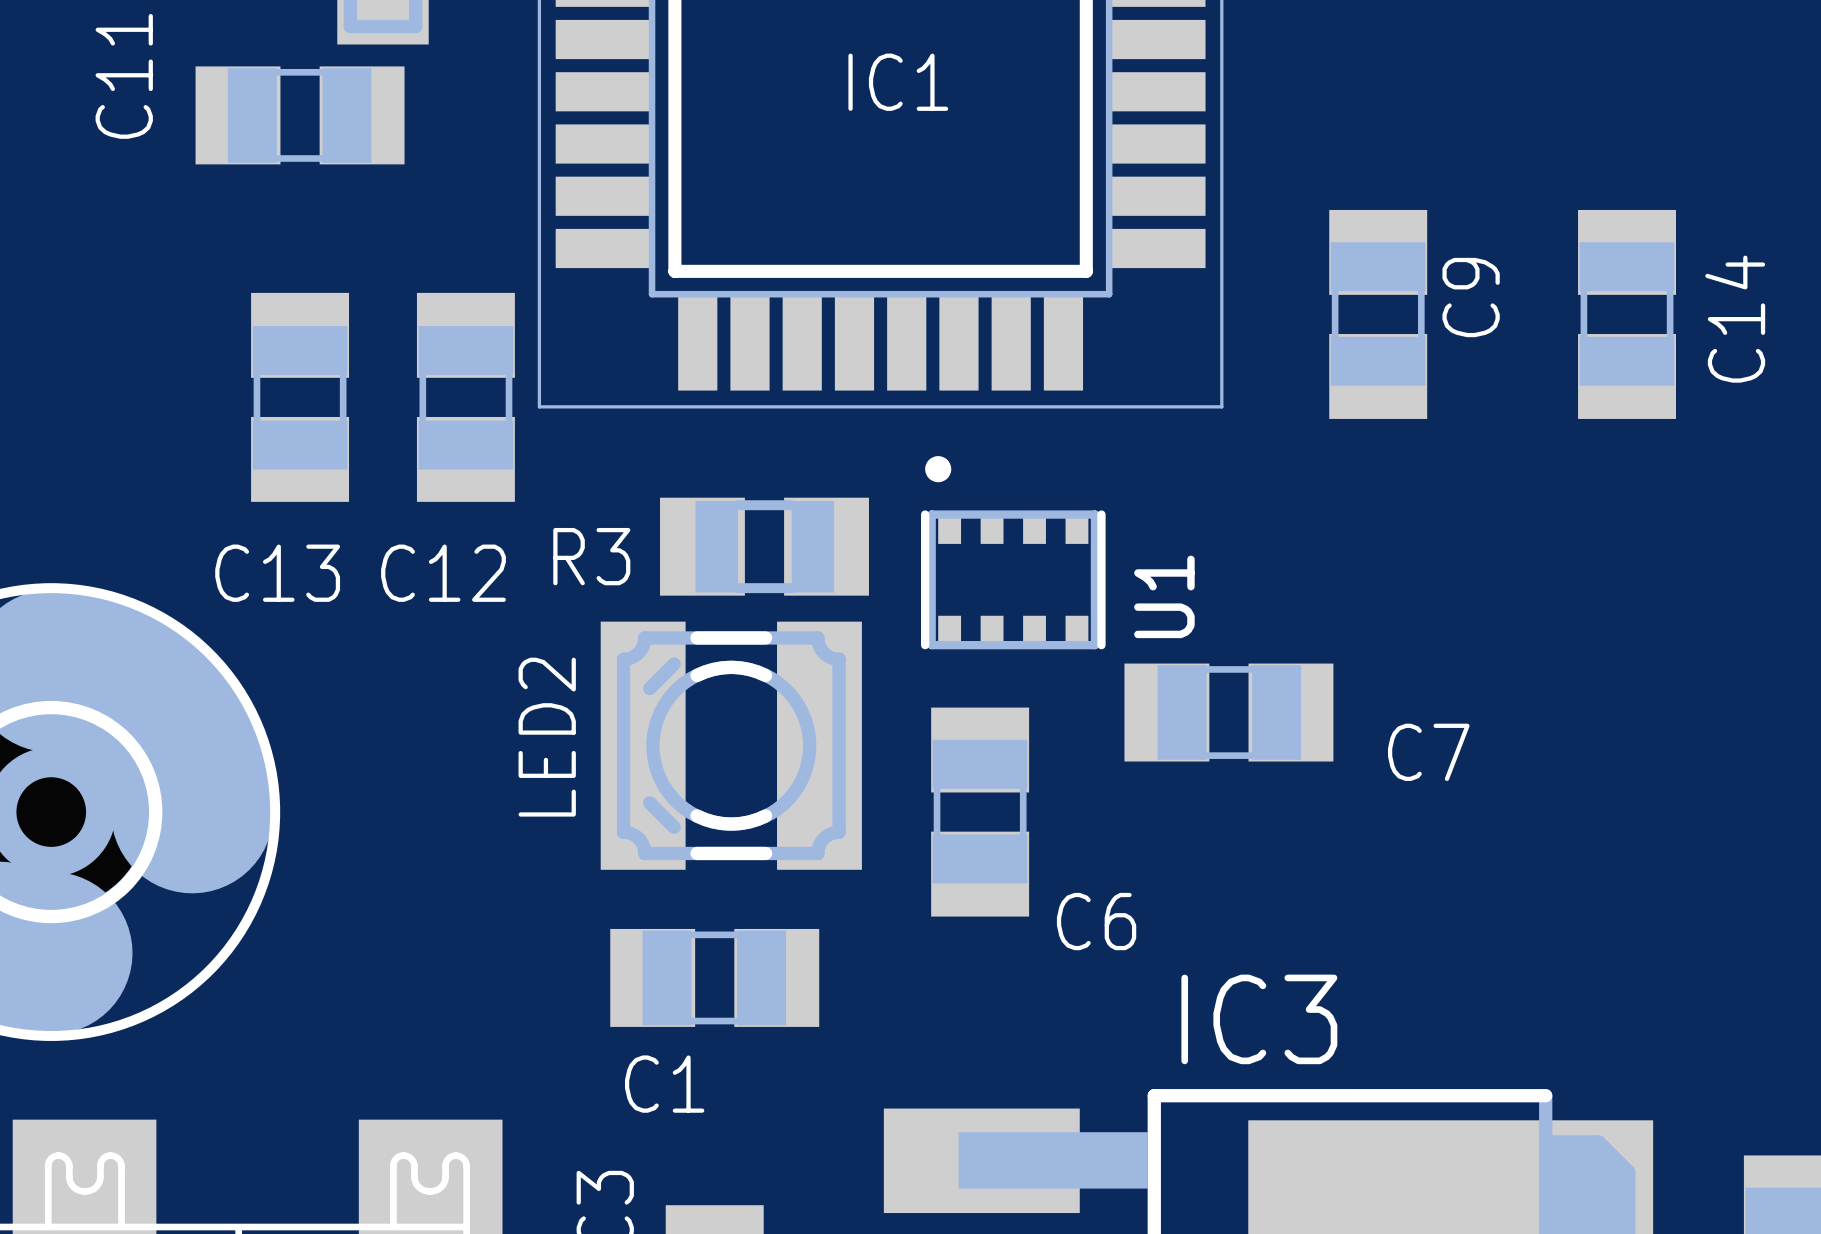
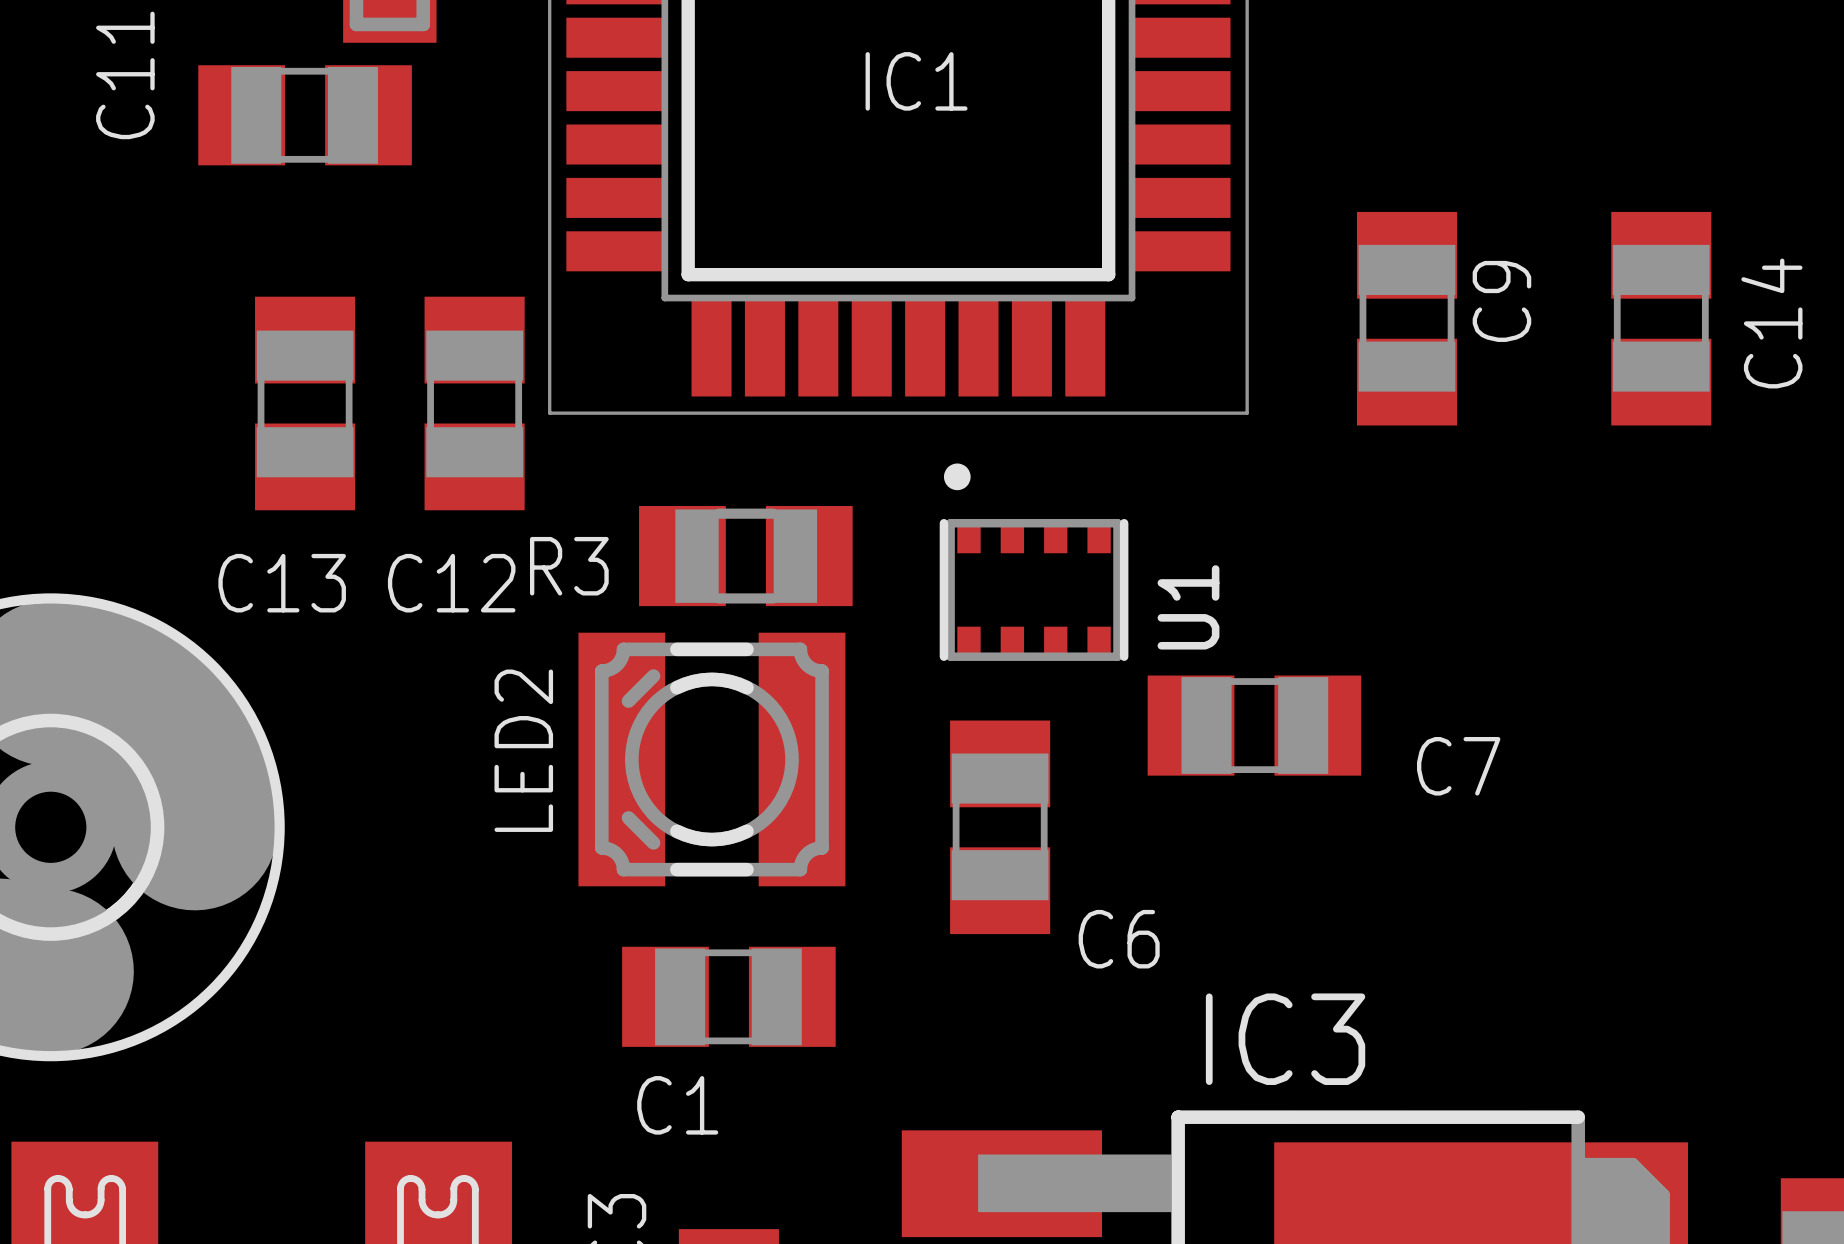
R3 position: (764, 546) -> (745, 556)
LED2 position: (731, 745) -> (711, 759)

